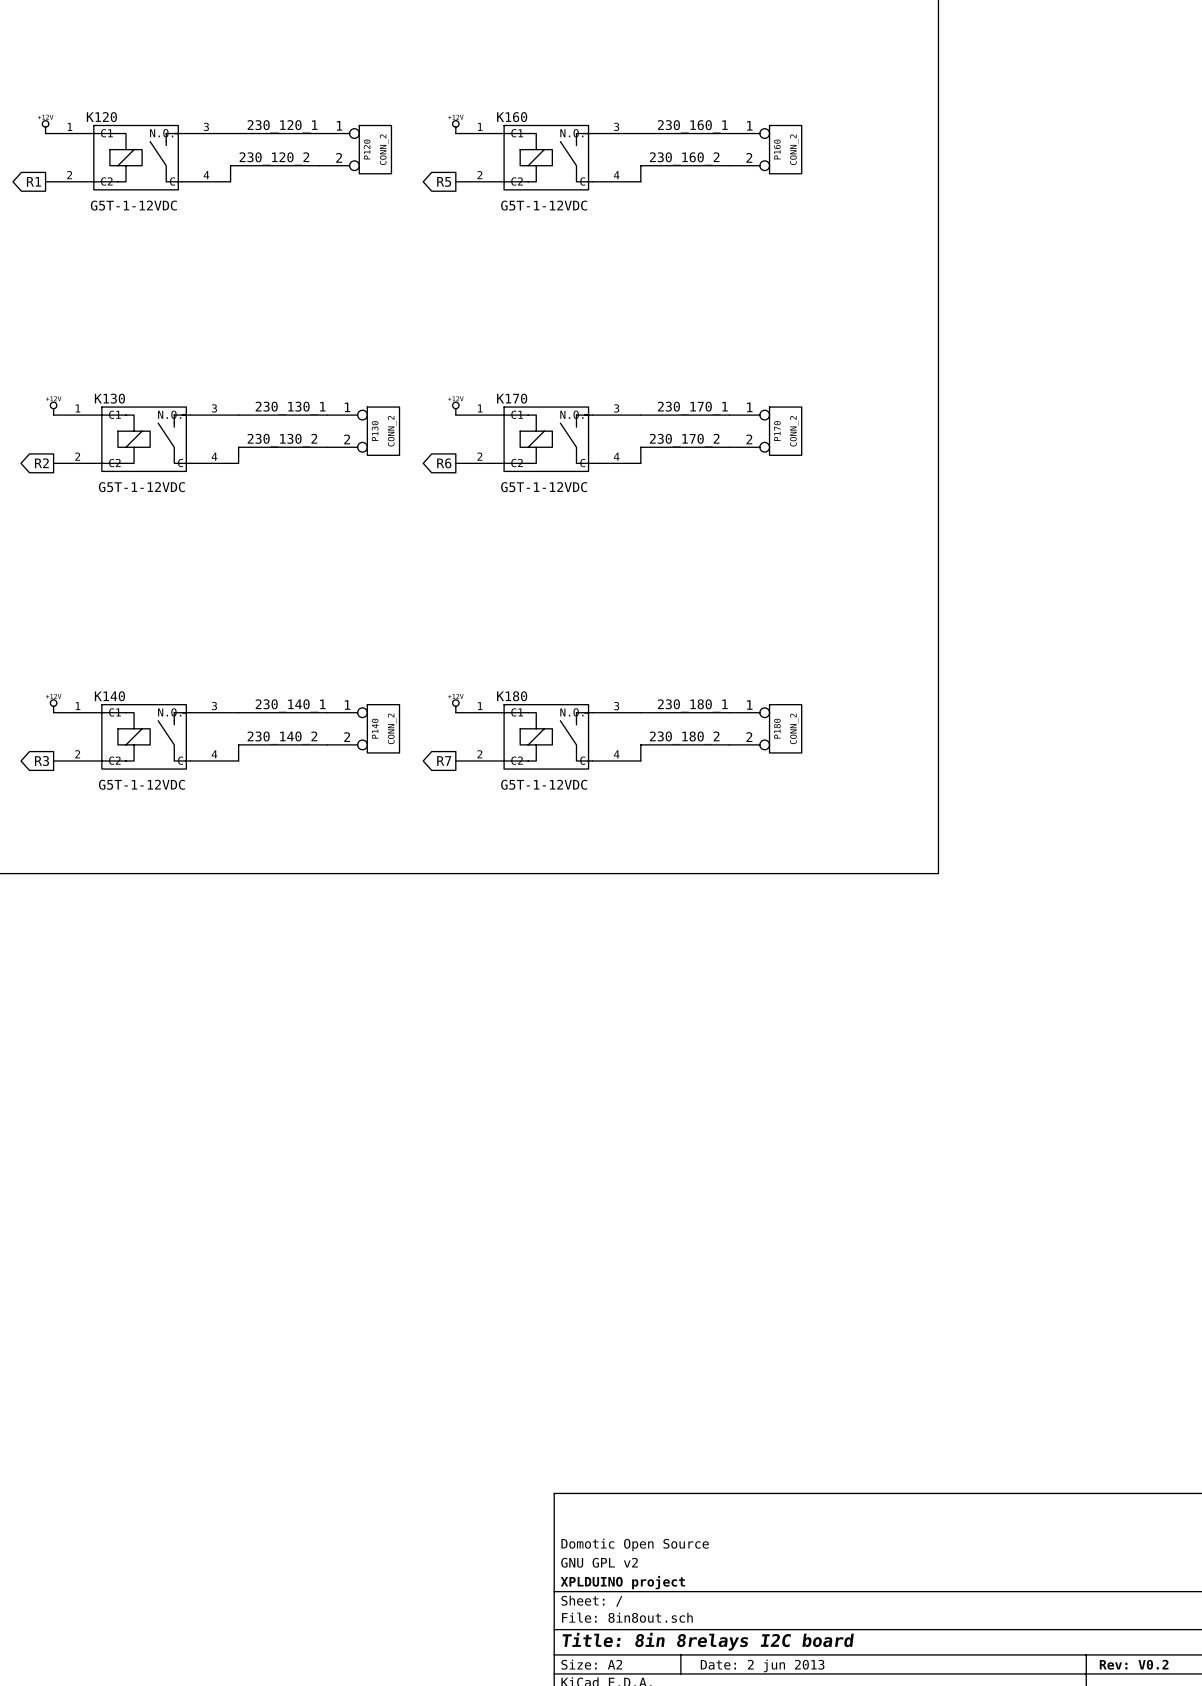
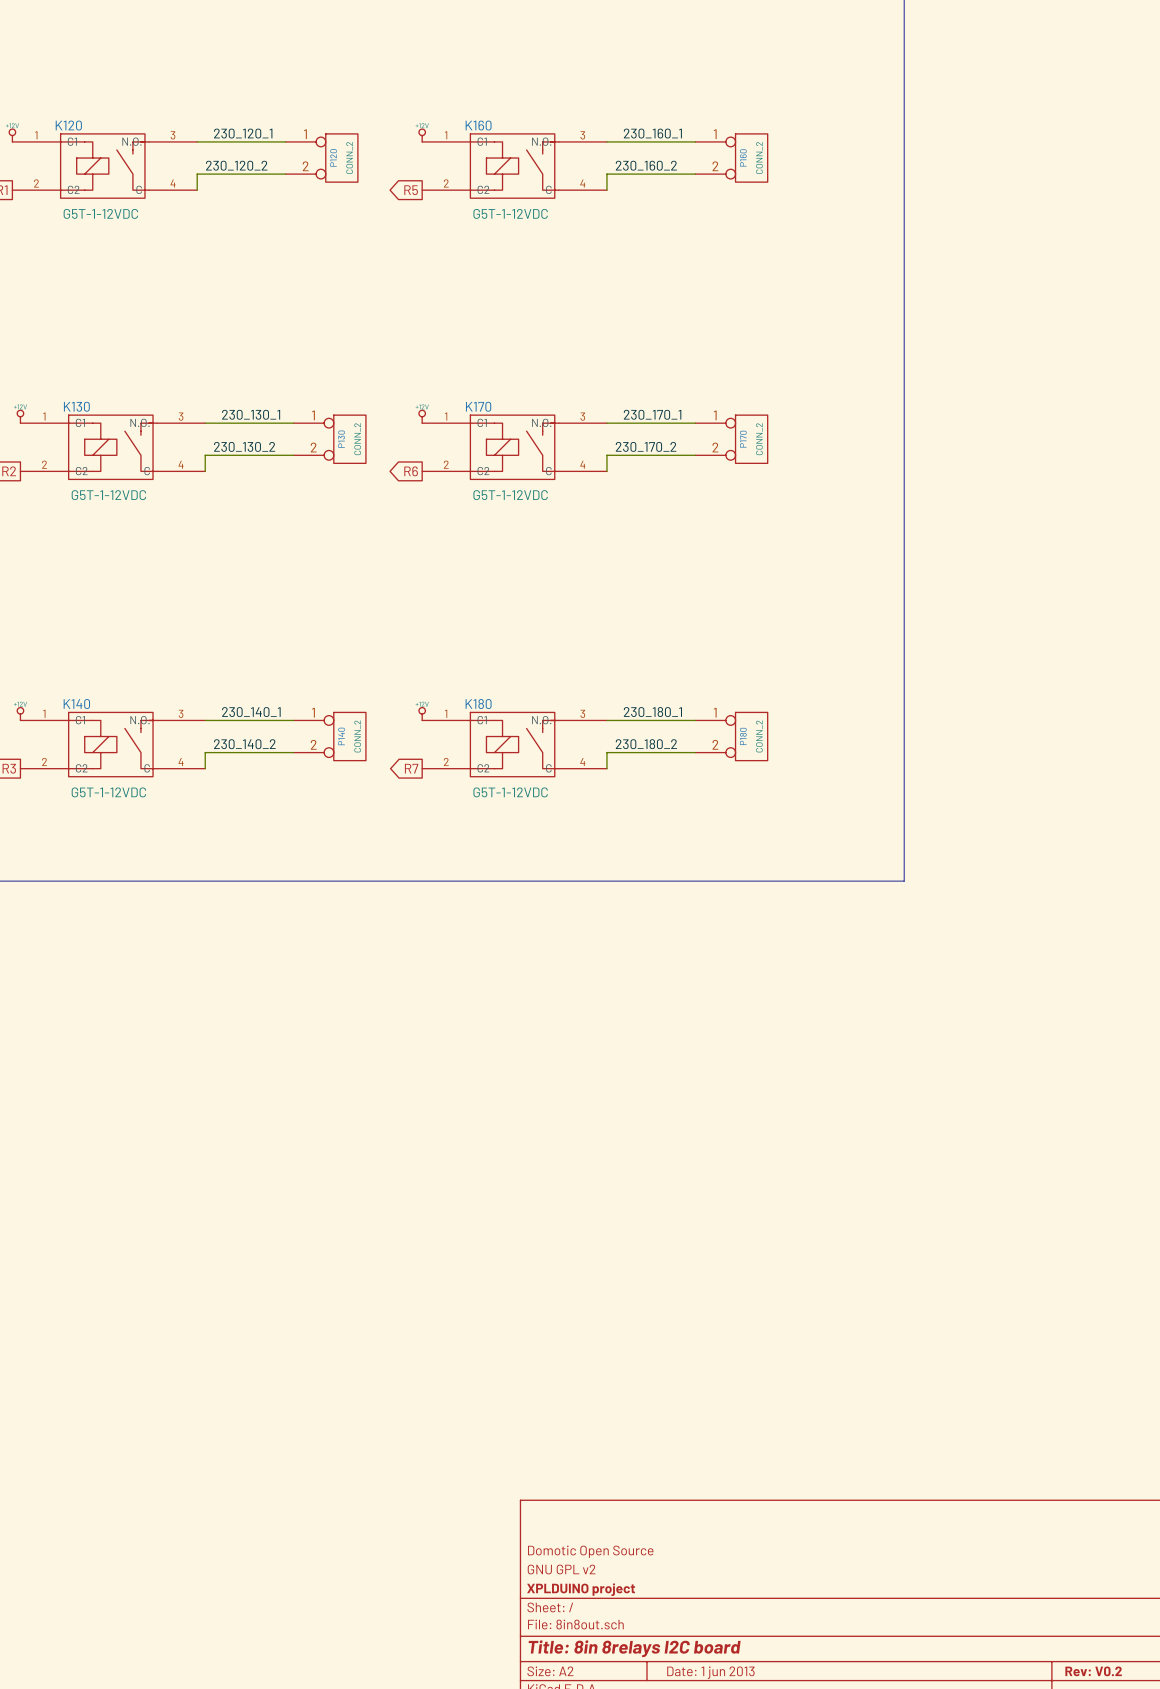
title block: Date: 2 jun 2013 (762, 1665) -> Date: 1 jun 2013 (710, 1672)

